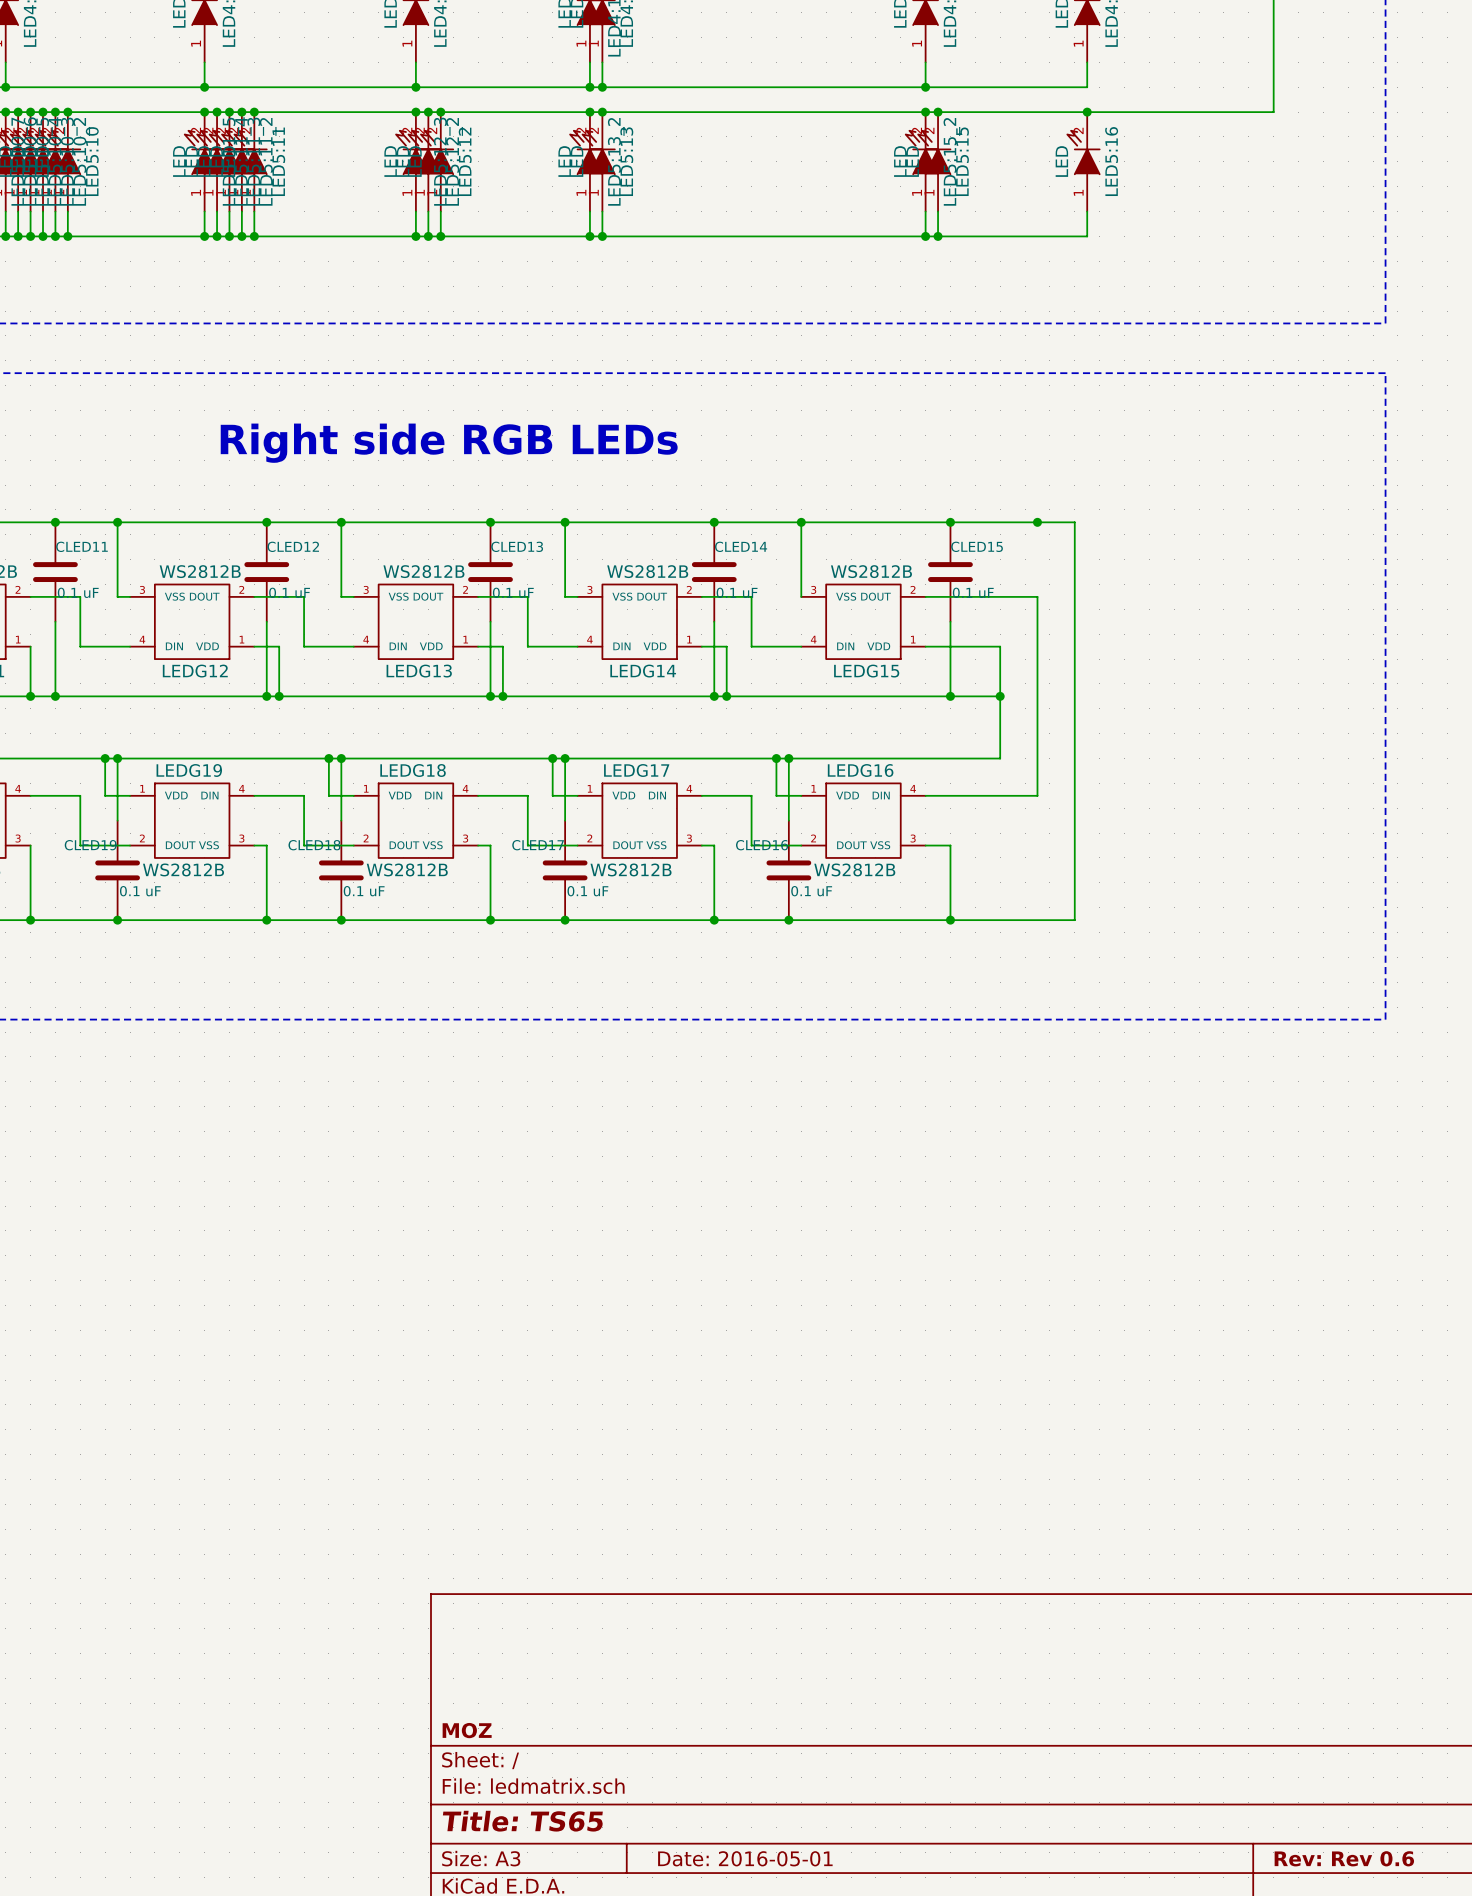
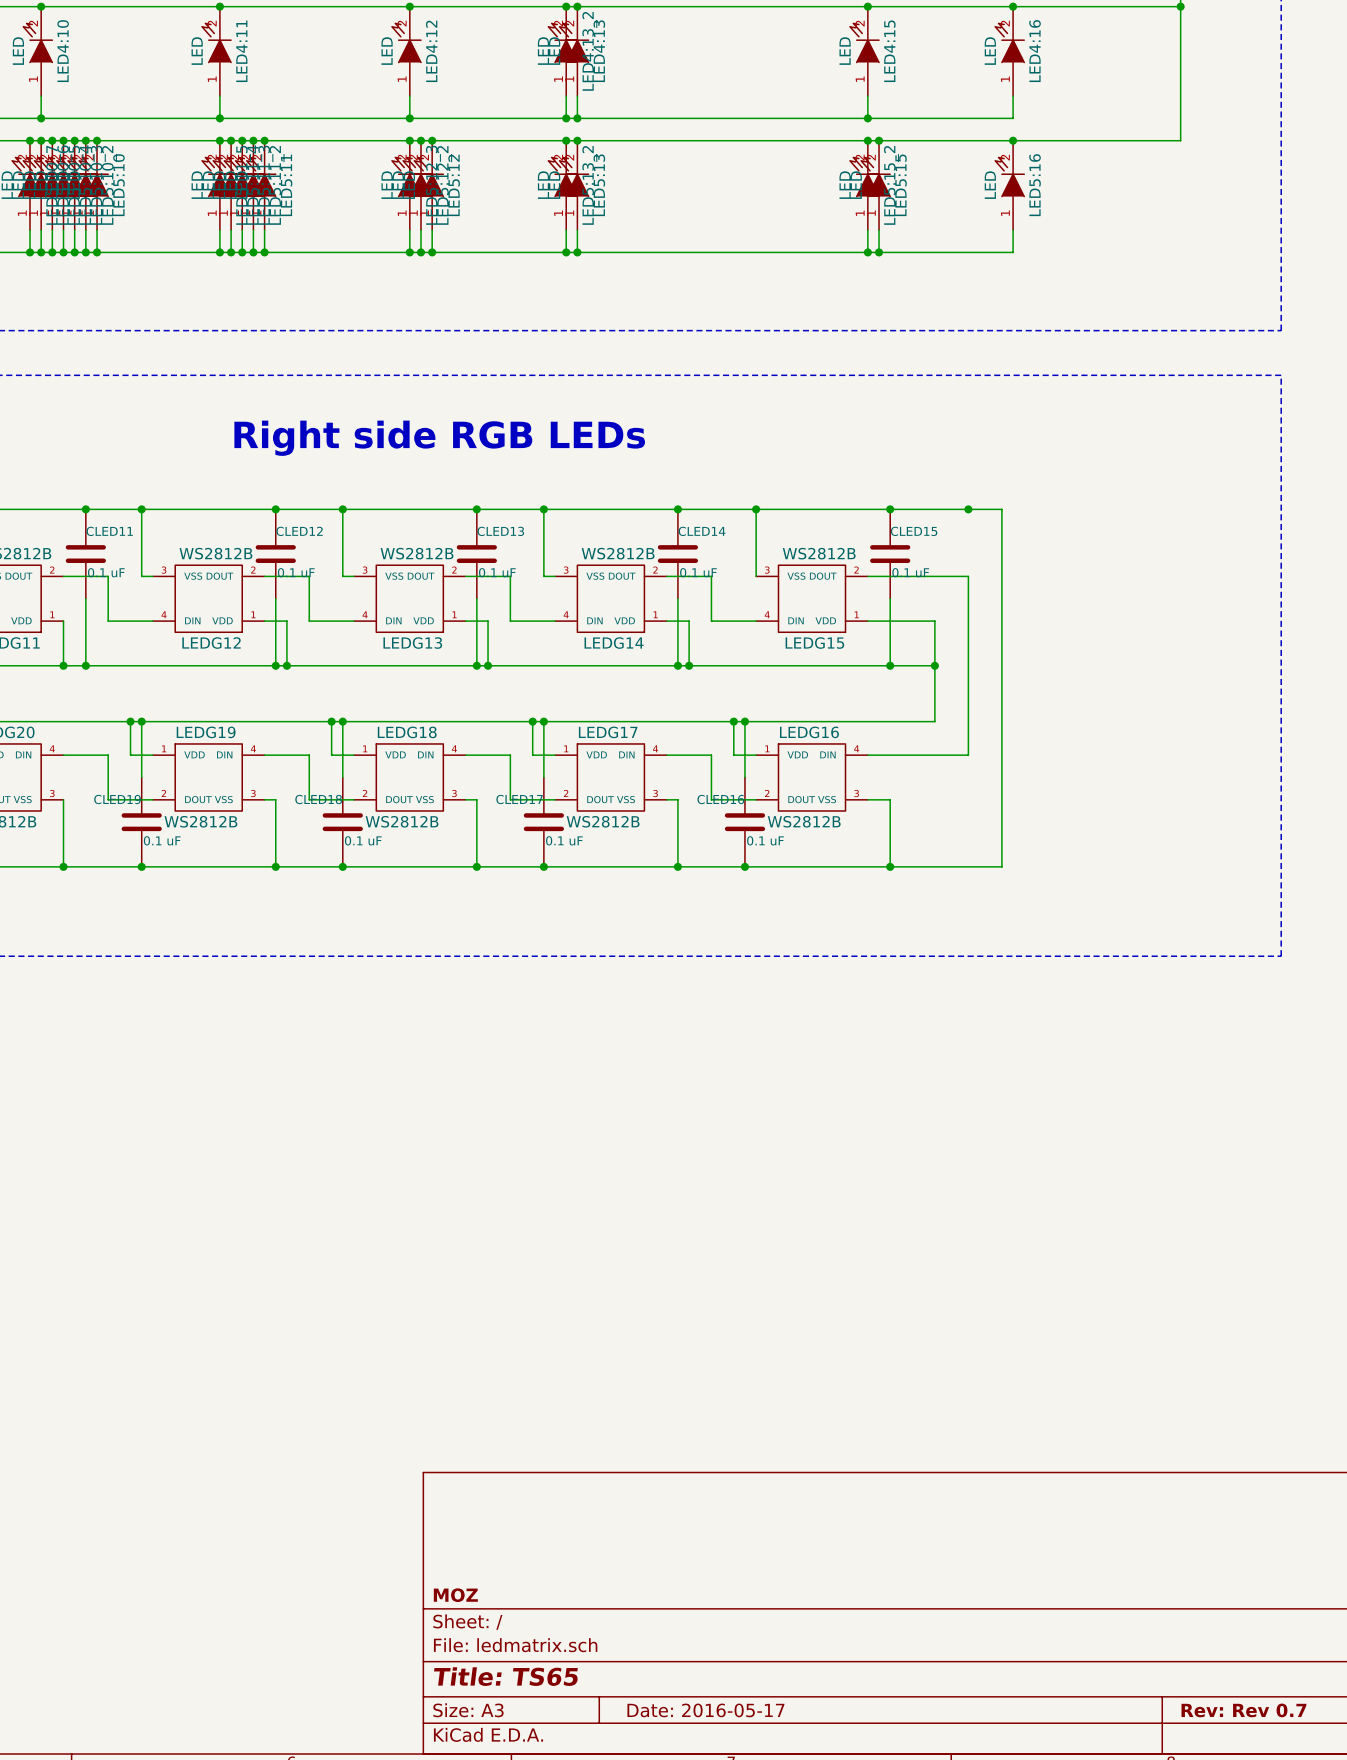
title block: Date: 2016-05-01 (745, 1858) -> Date: 2016-05-17 (705, 1710)
title block: Rev: Rev 0.6 (1344, 1858) -> Rev: Rev 0.7 (1243, 1710)

